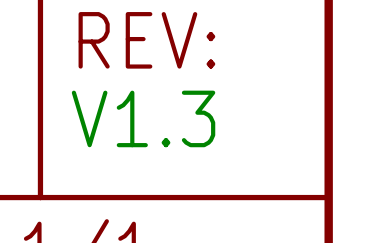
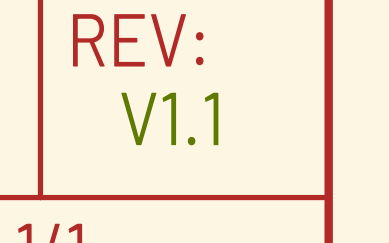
text: V1.3 (143, 118) -> V1.1 (169, 119)

